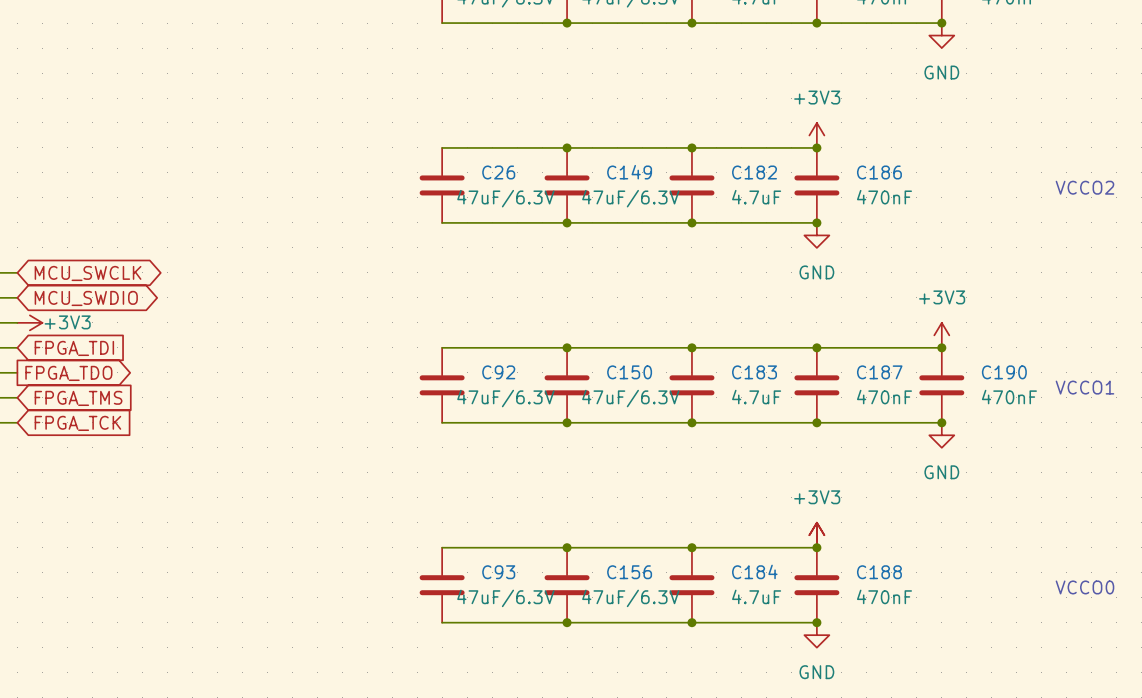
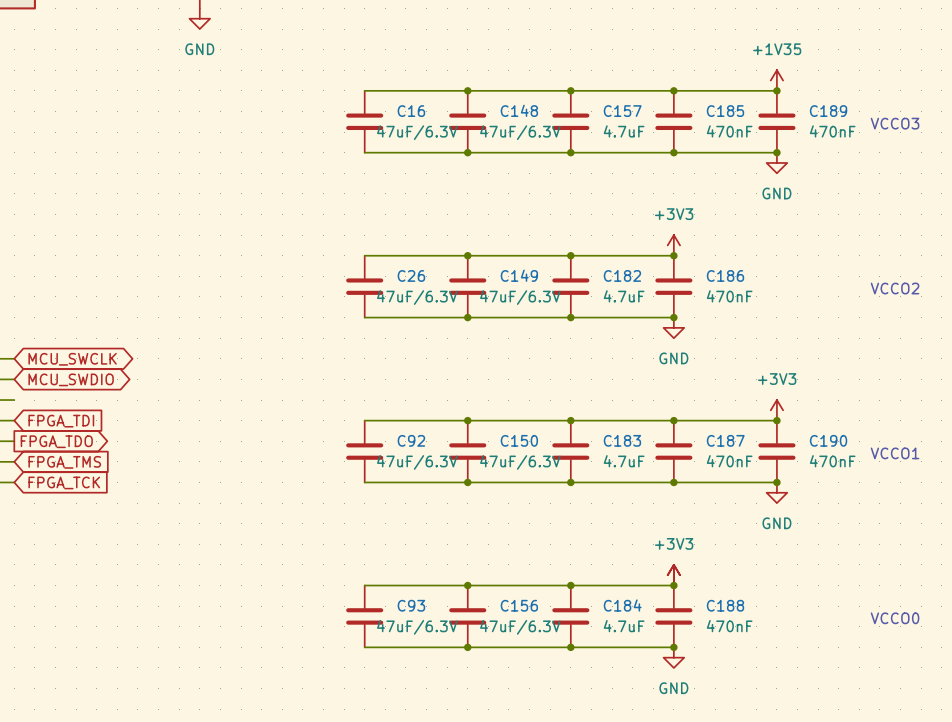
power symbol: +3V3 (29, 322) -> none

